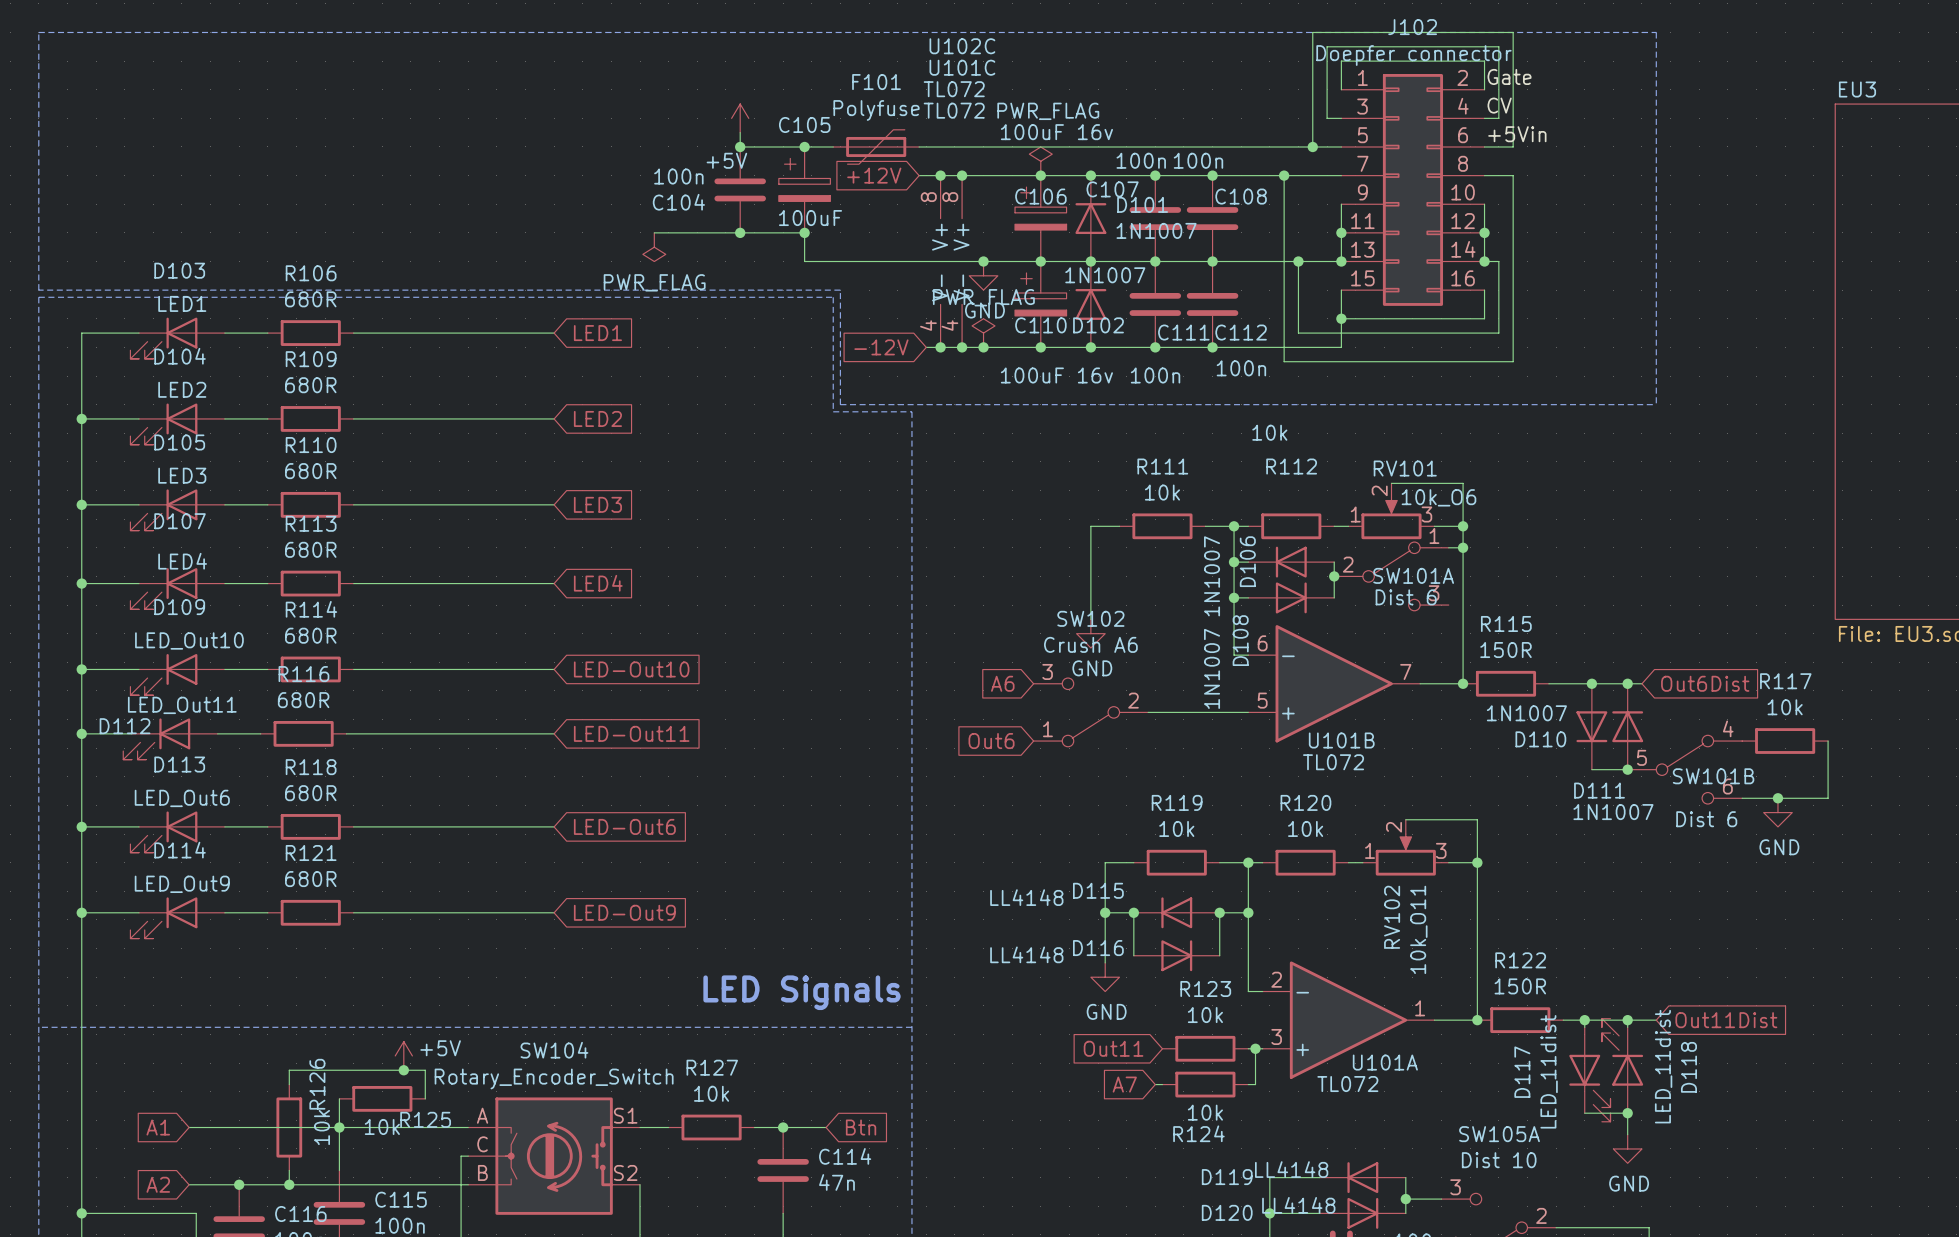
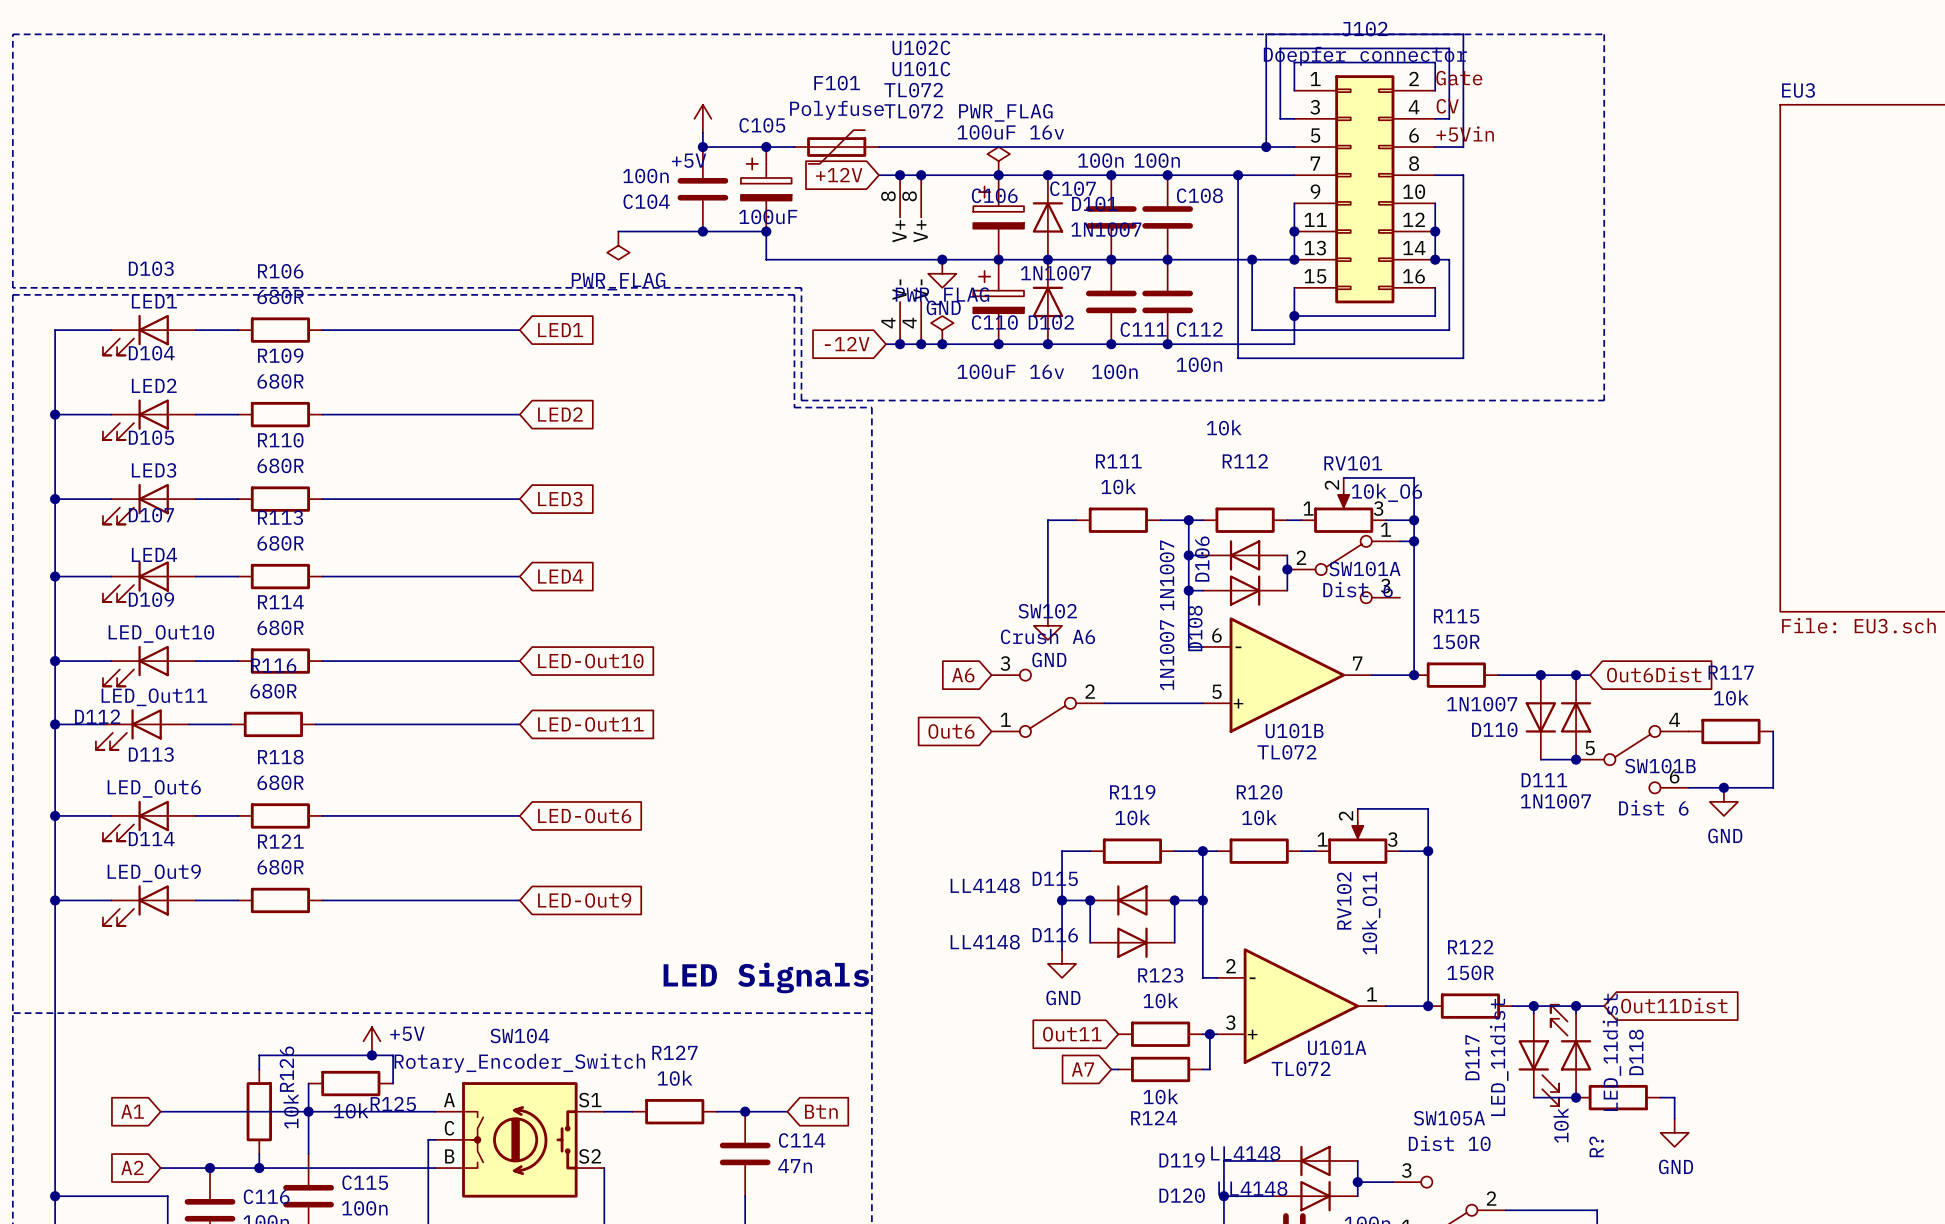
wire: (1627, 1113) (1627, 1134) -> none
R?: none -> 10k (1618, 1097)
wire: none -> (1660, 1097) (1674, 1097) (1674, 1118)
power symbol position: GND (1627, 1148) -> GND (1674, 1132)

